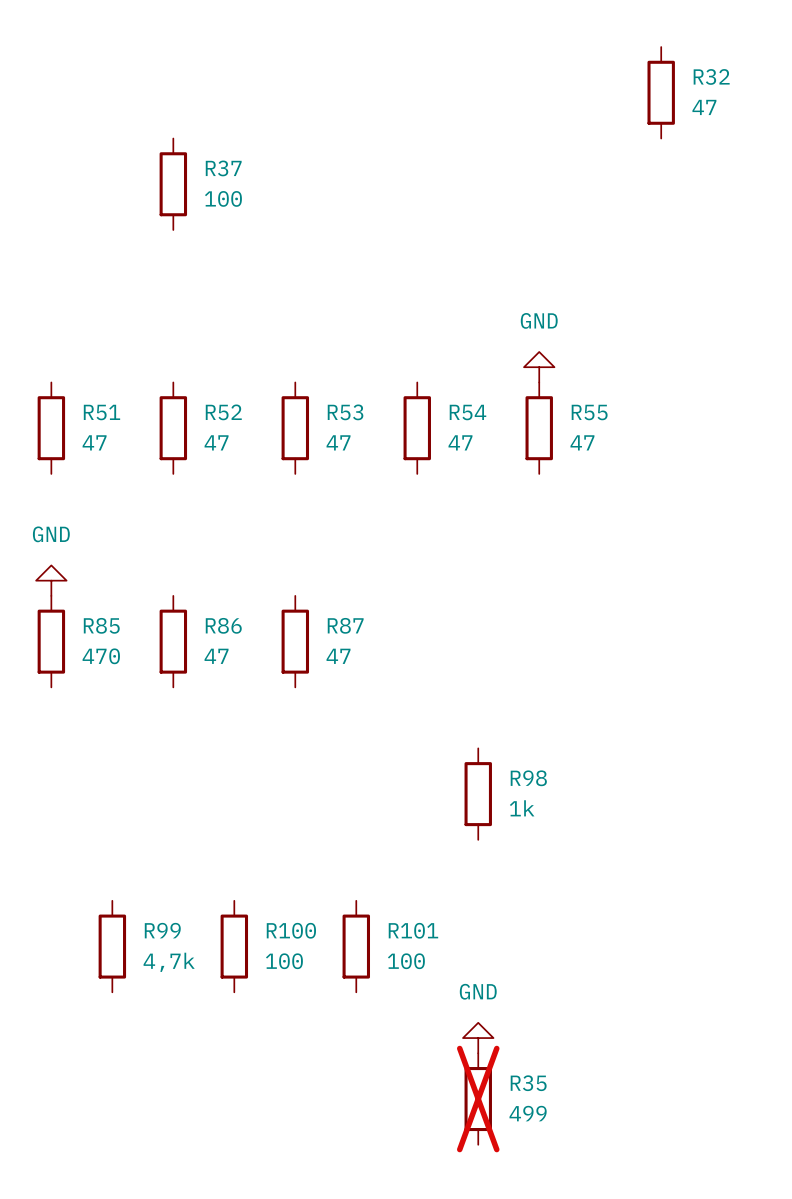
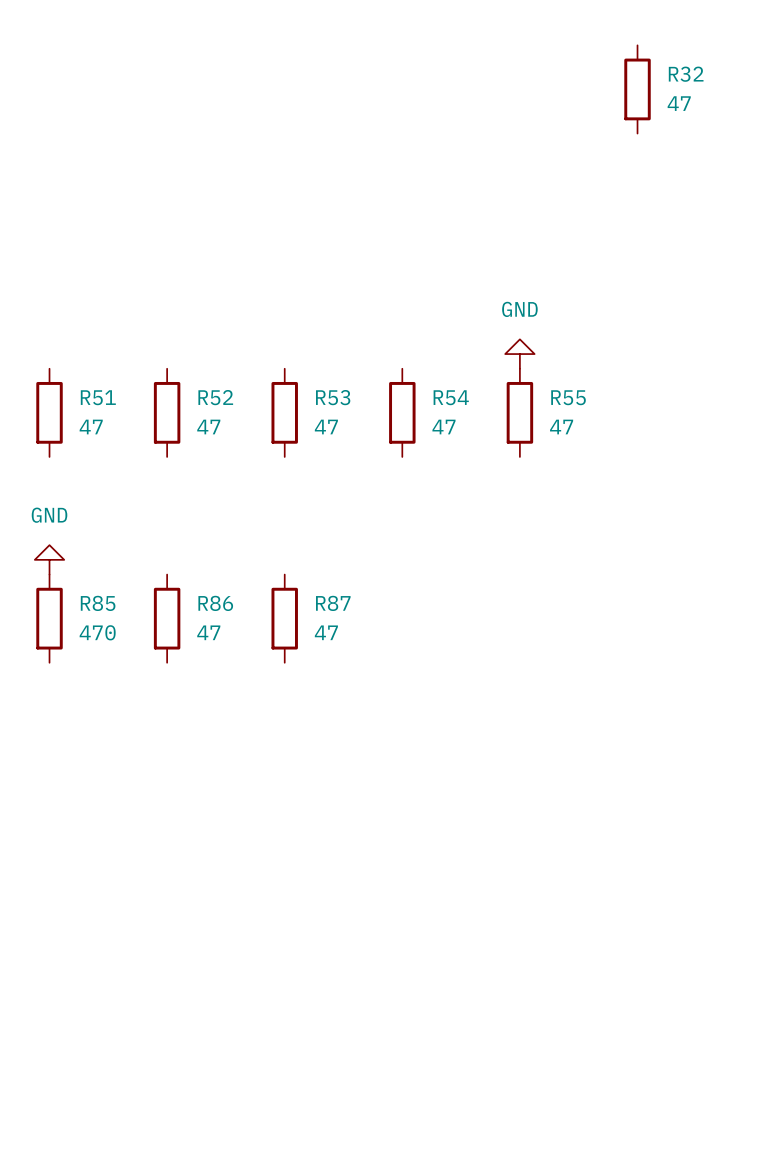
R37: 100 (173, 184) -> none
R98: 1k (478, 794) -> none
R99: 4,7k (112, 946) -> none
R100: 100 (234, 946) -> none
R101: 100 (356, 946) -> none
power symbol: GND (478, 1038) -> none
R35: 499 (478, 1099) -> none

